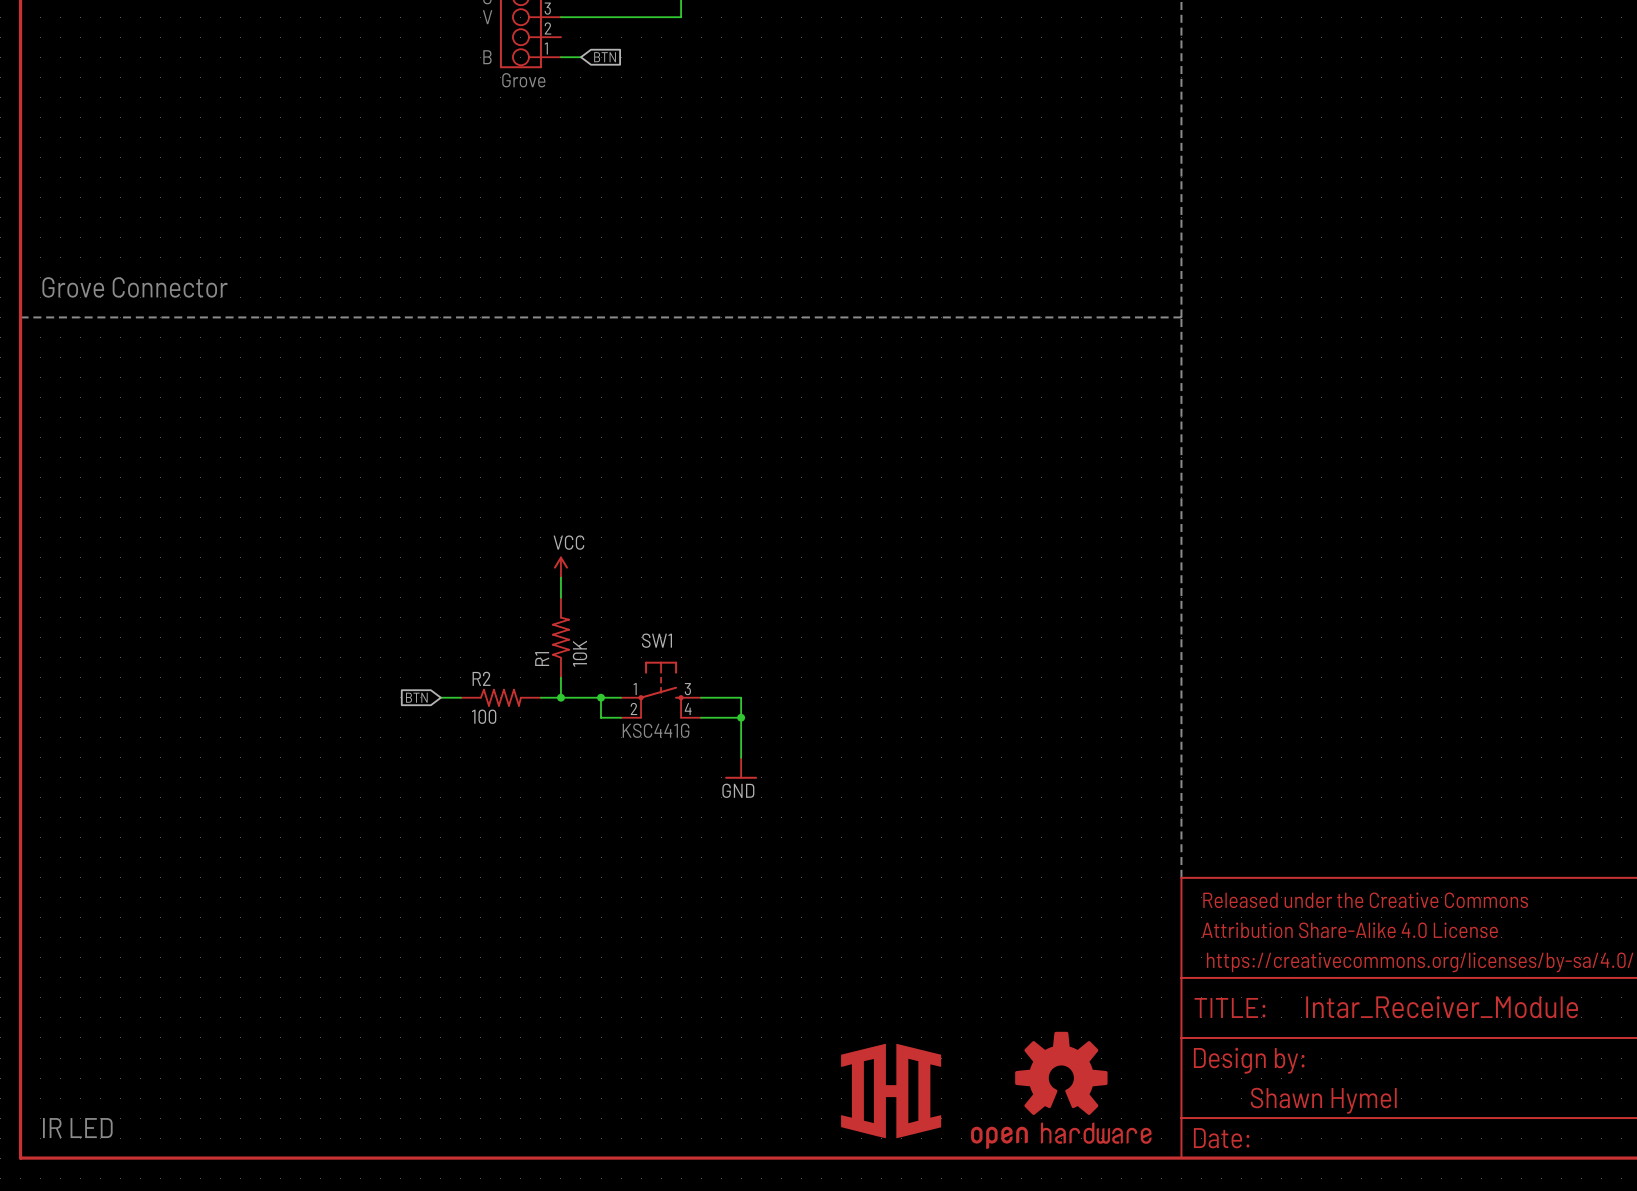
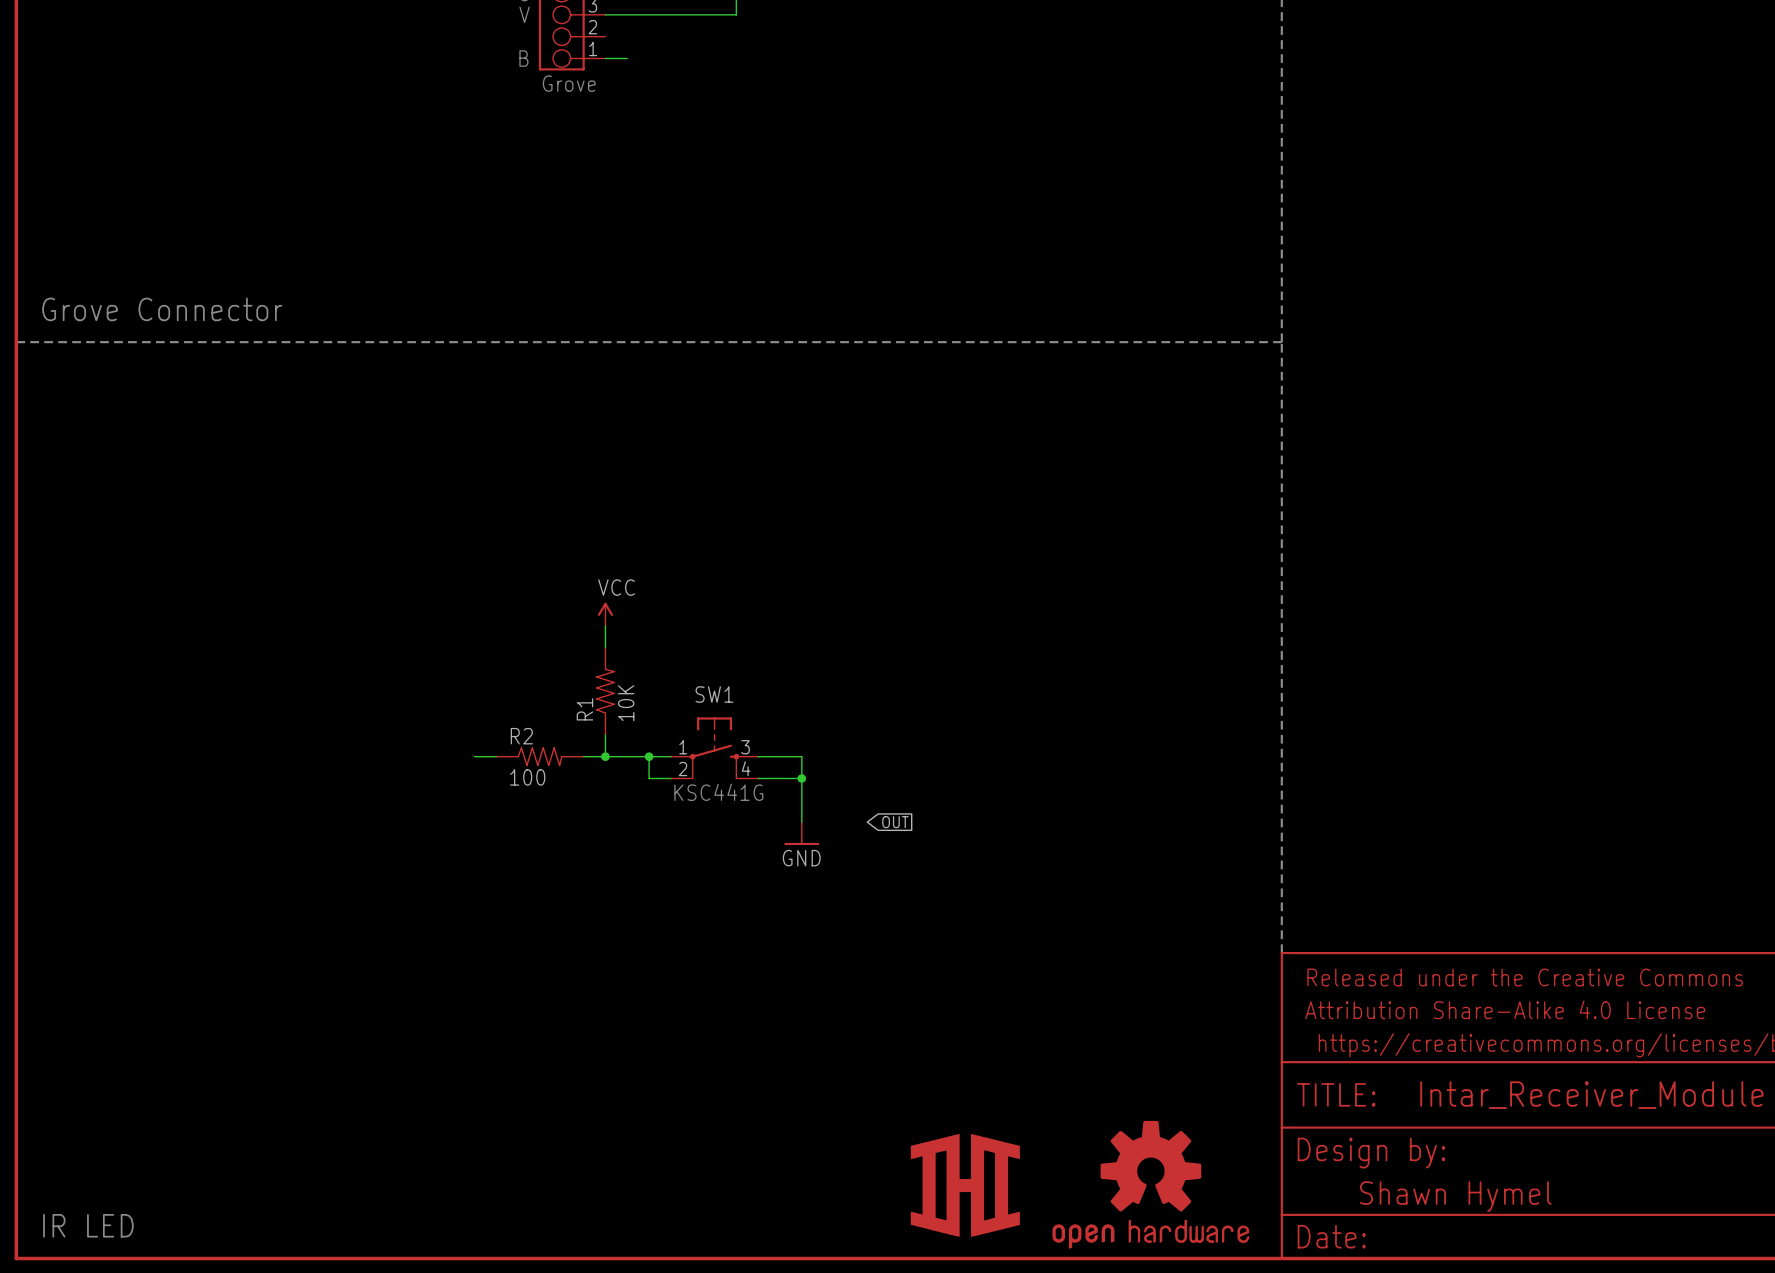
global label: BTN (605, 57) -> none
global label: BTN (416, 697) -> none
global label: none -> OUT (895, 822)

